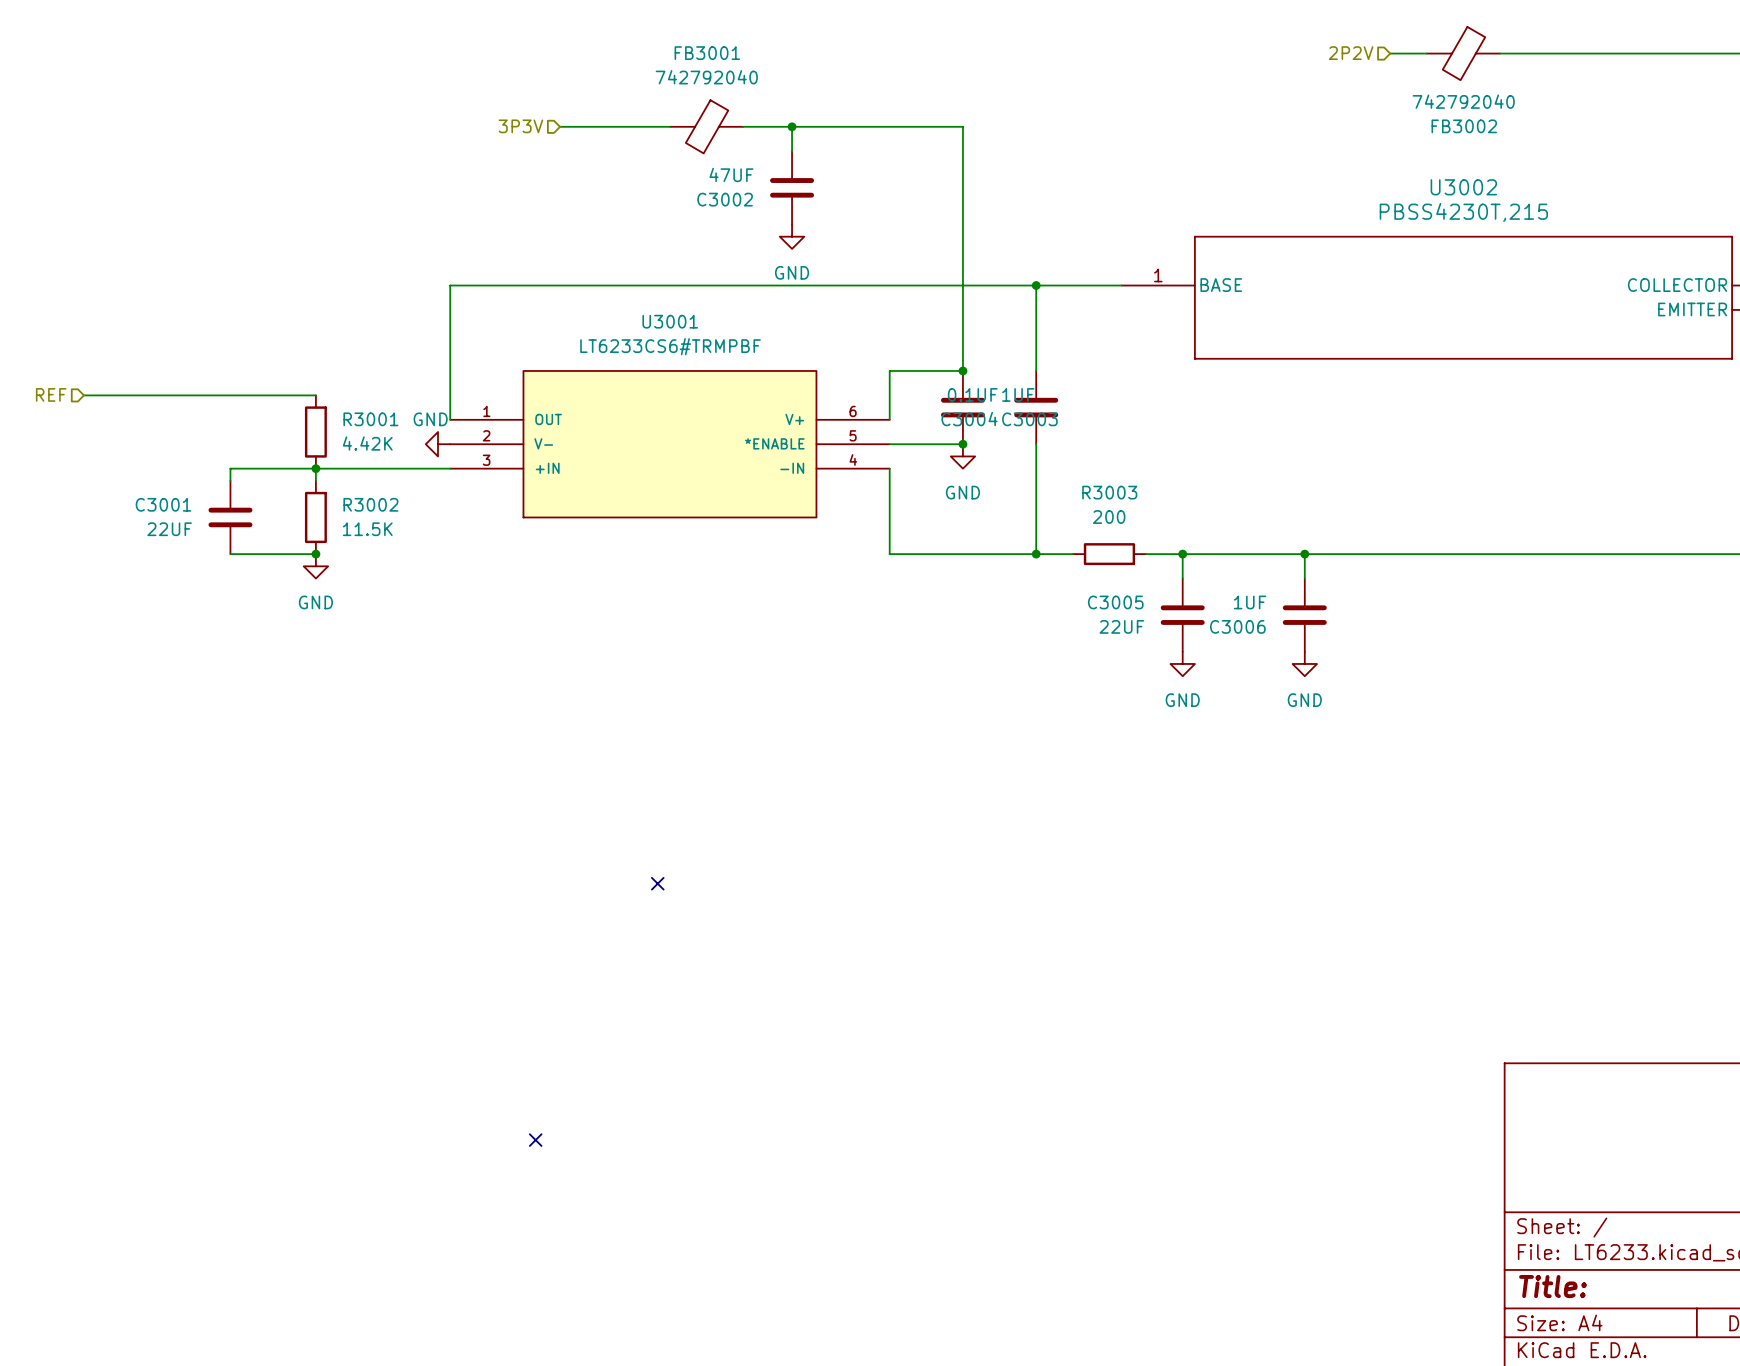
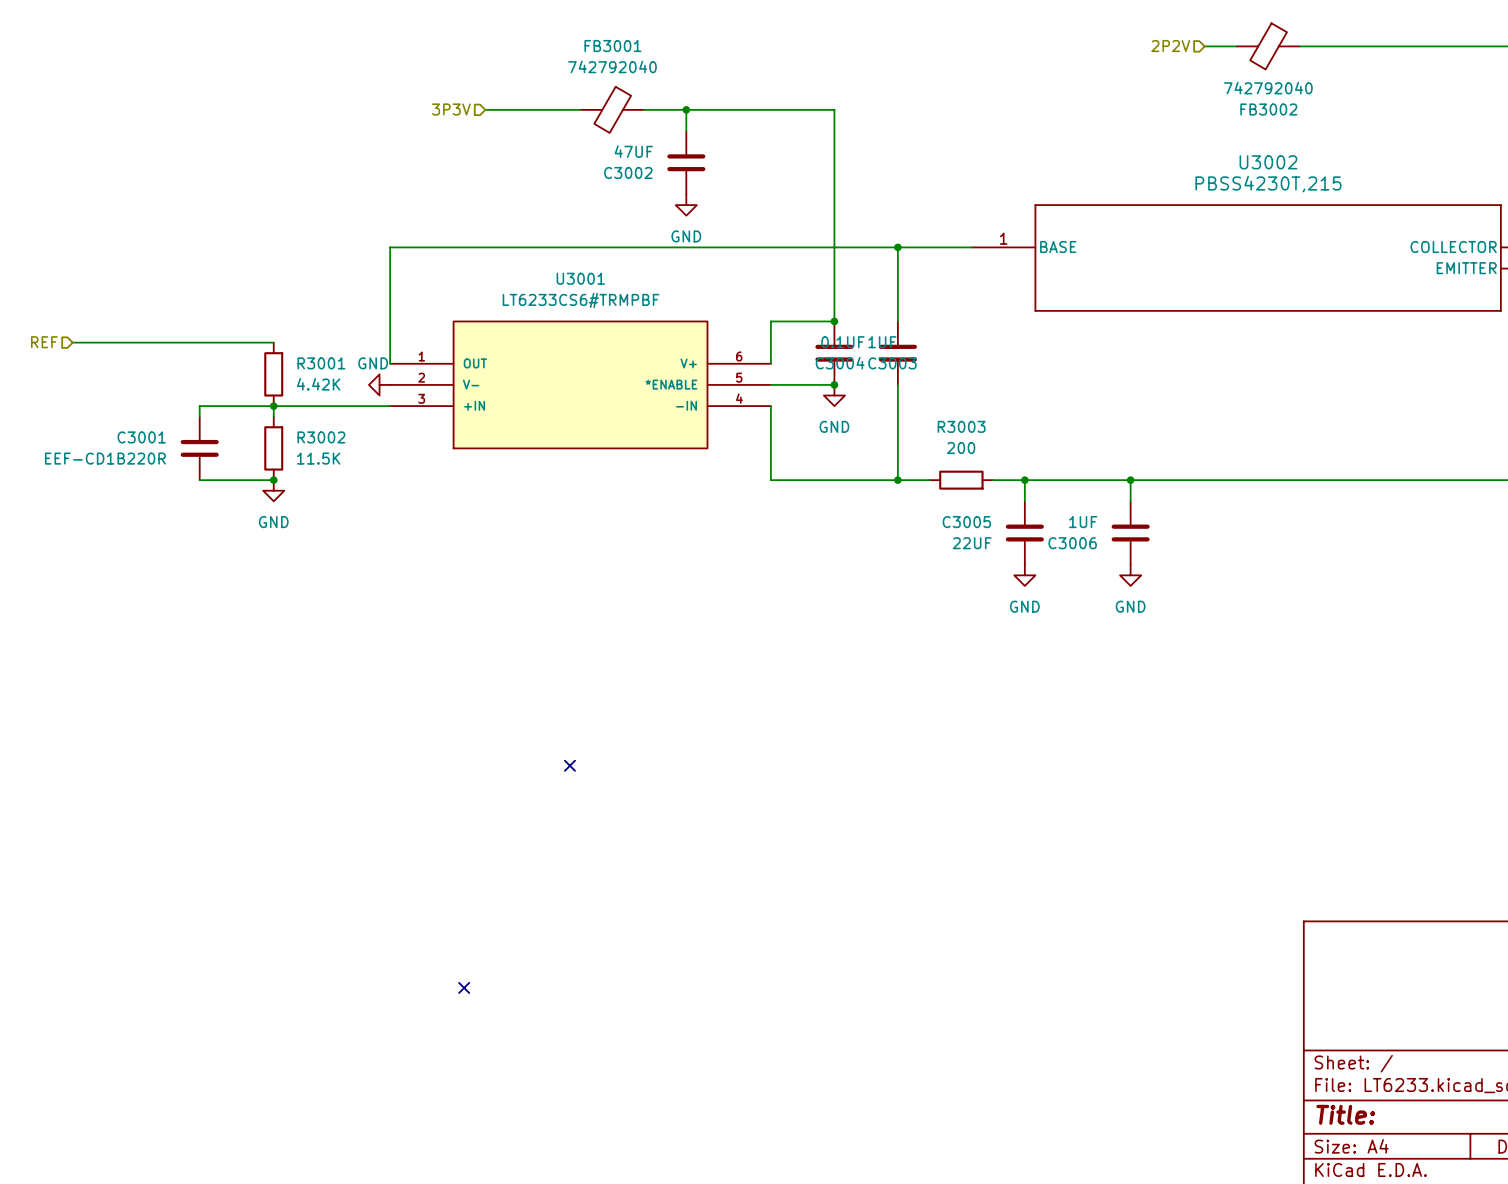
C3001 value: 22UF (169, 529) -> EEF-CD1B220R (105, 458)

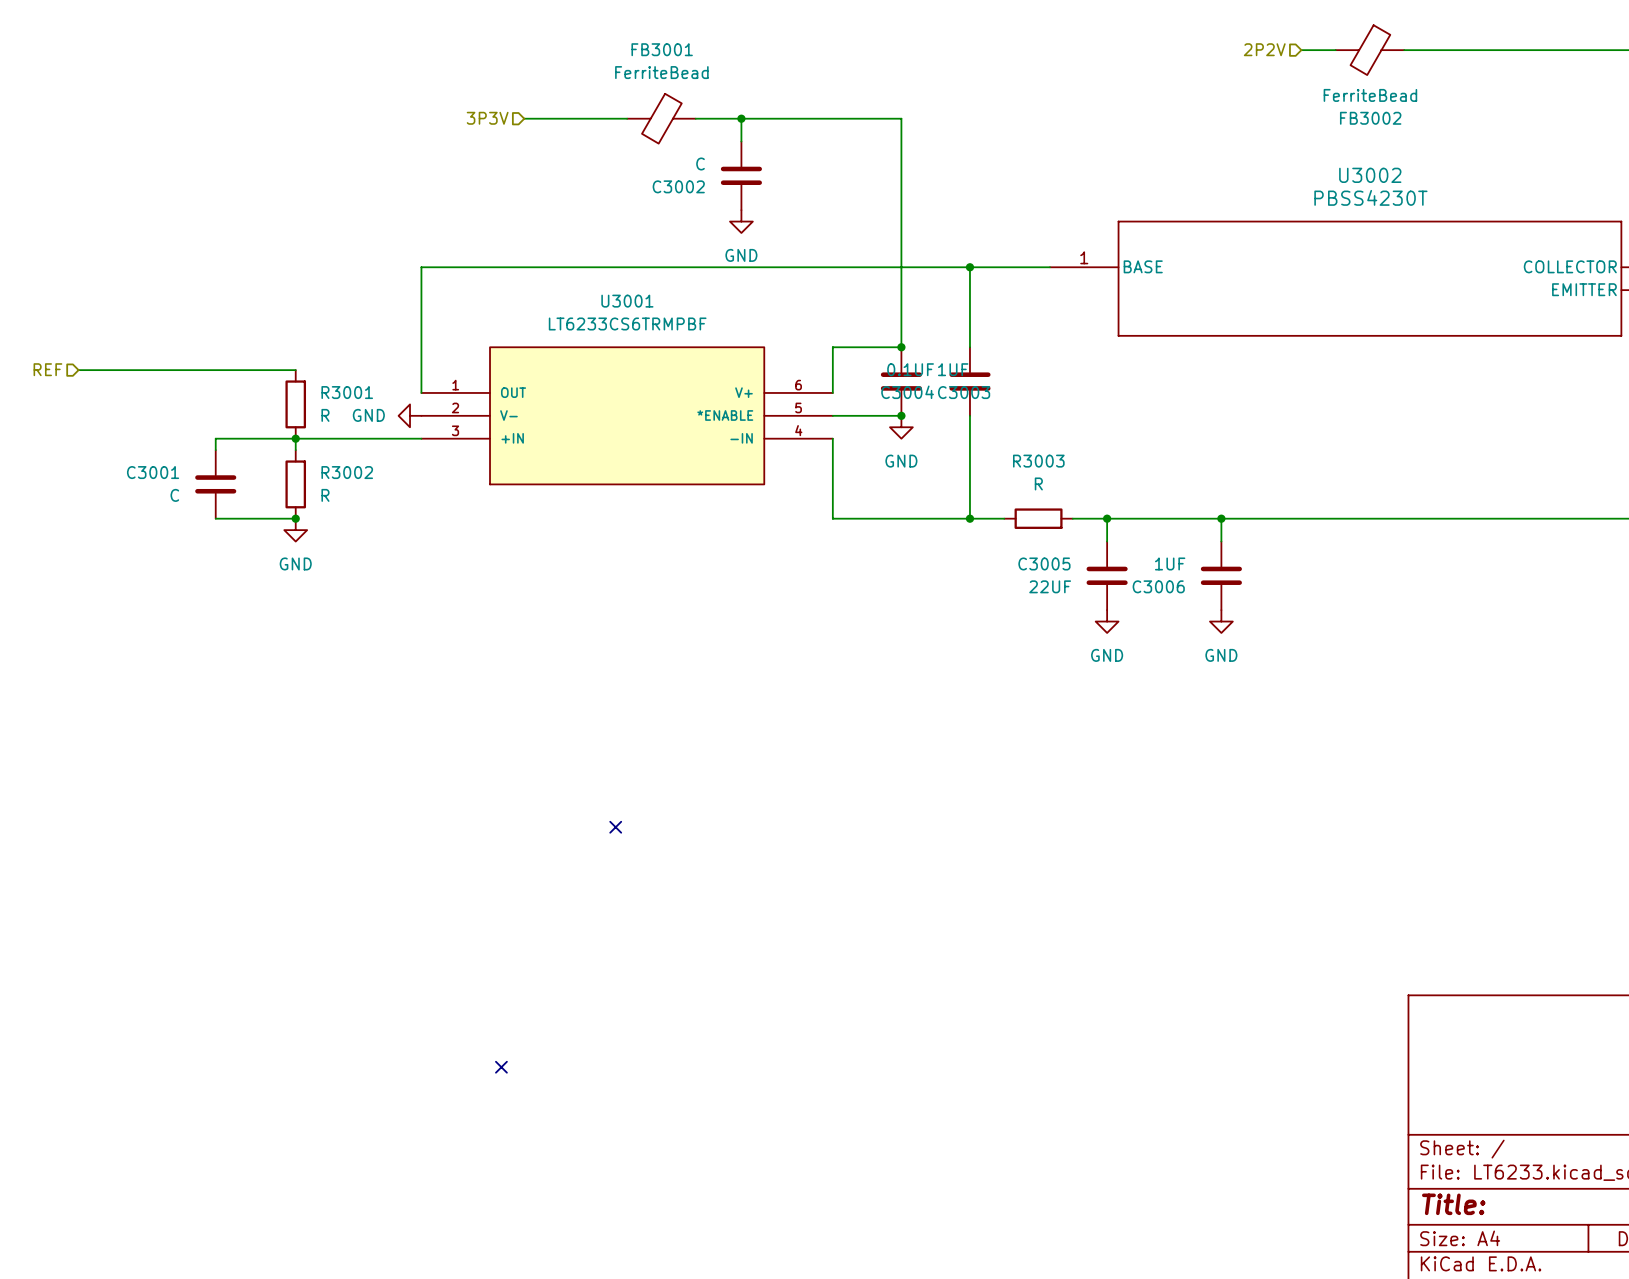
FB3001 value: 742792040 (612, 66) -> FerriteBead (661, 72)
FB3002 value: 742792040 (1268, 88) -> FerriteBead (1370, 95)
C3002 value: 47UF (633, 151) -> C (700, 163)
U3002 value: PBSS4230T,215 (1268, 184) -> PBSS4230T (1370, 197)
U3001 value: LT6233CS6#TRMPBF (581, 300) -> LT6233CS6TRMPBF (627, 323)
power symbol text position: GND (373, 363) -> GND (368, 415)
R3001 value: 4.42K (318, 384) -> R (325, 415)
R3003 value: 200 (961, 448) -> R (1038, 483)
C3001 value: EEF-CD1B220R (105, 458) -> C (174, 495)
R3002 value: 11.5K (318, 458) -> R (325, 495)

